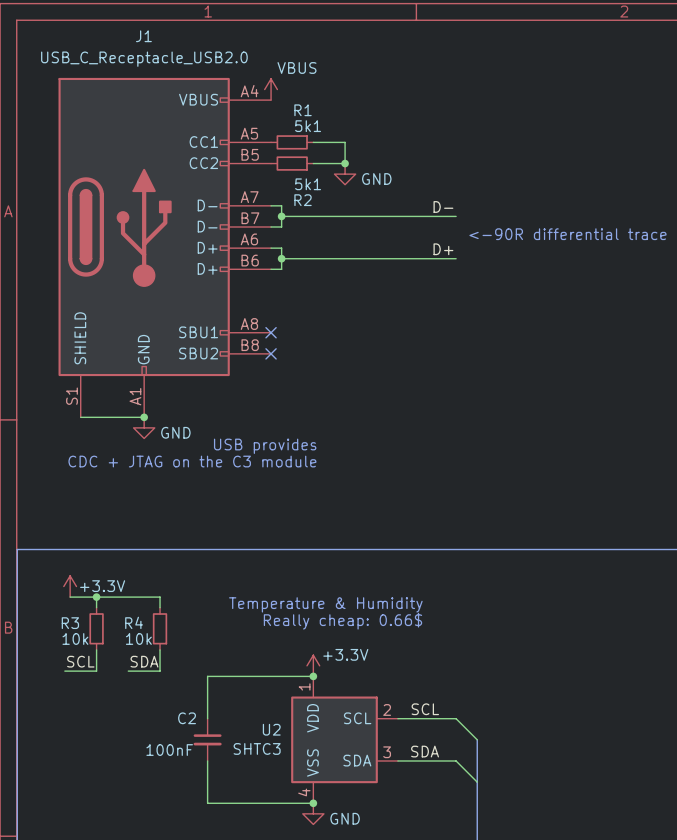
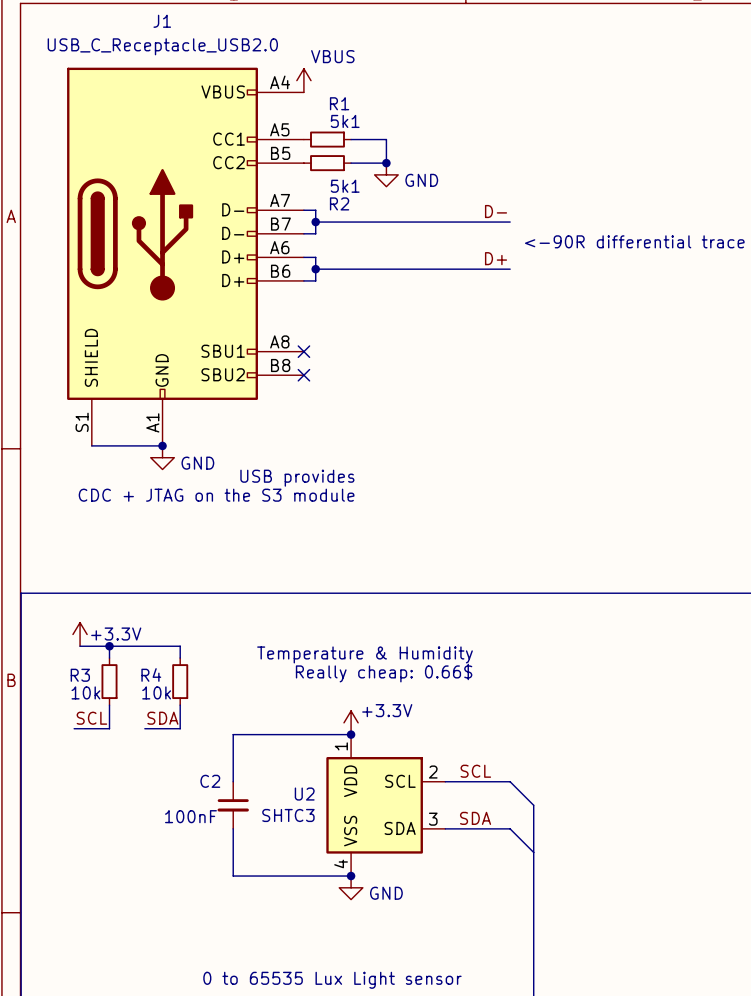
text: CDC + JTAG on the C3 module (192, 461) -> CDC + JTAG on the S3 module (216, 495)

